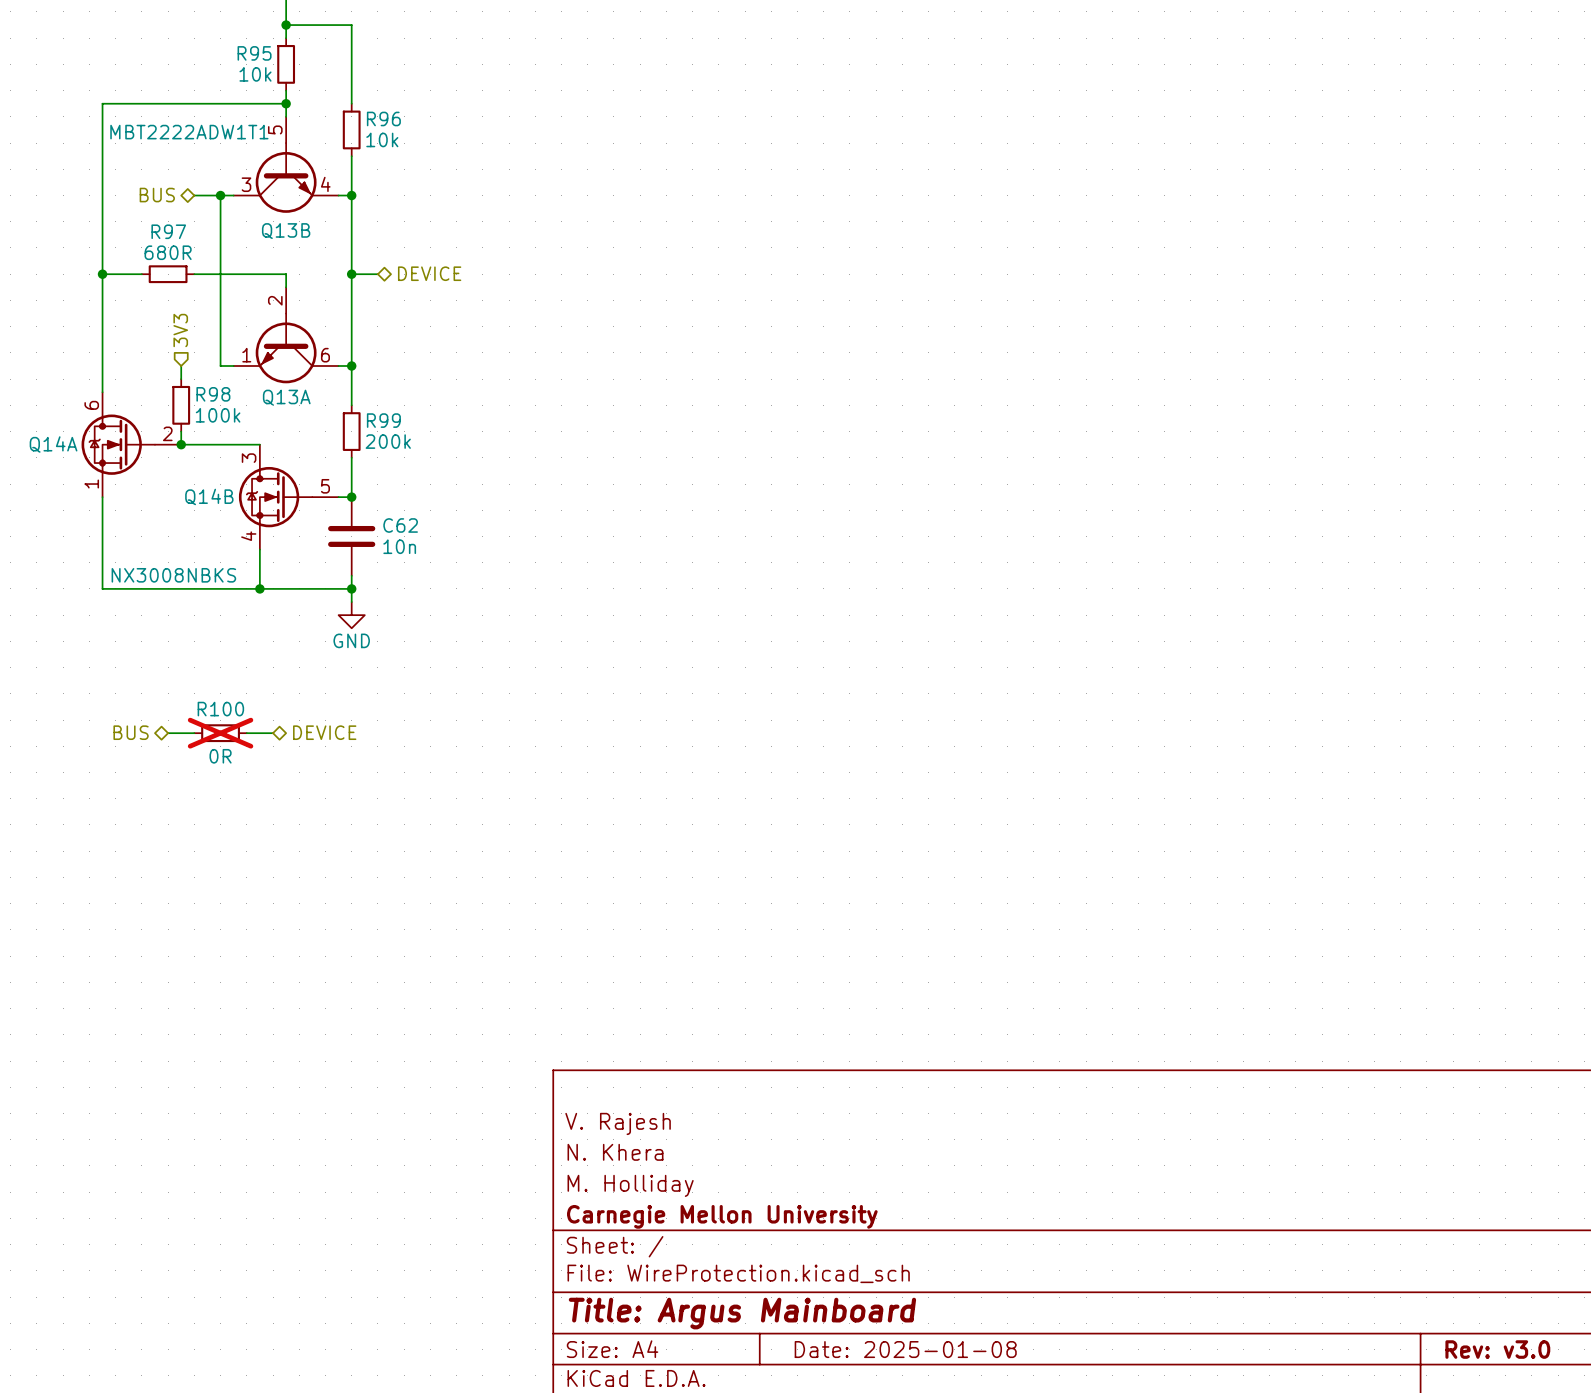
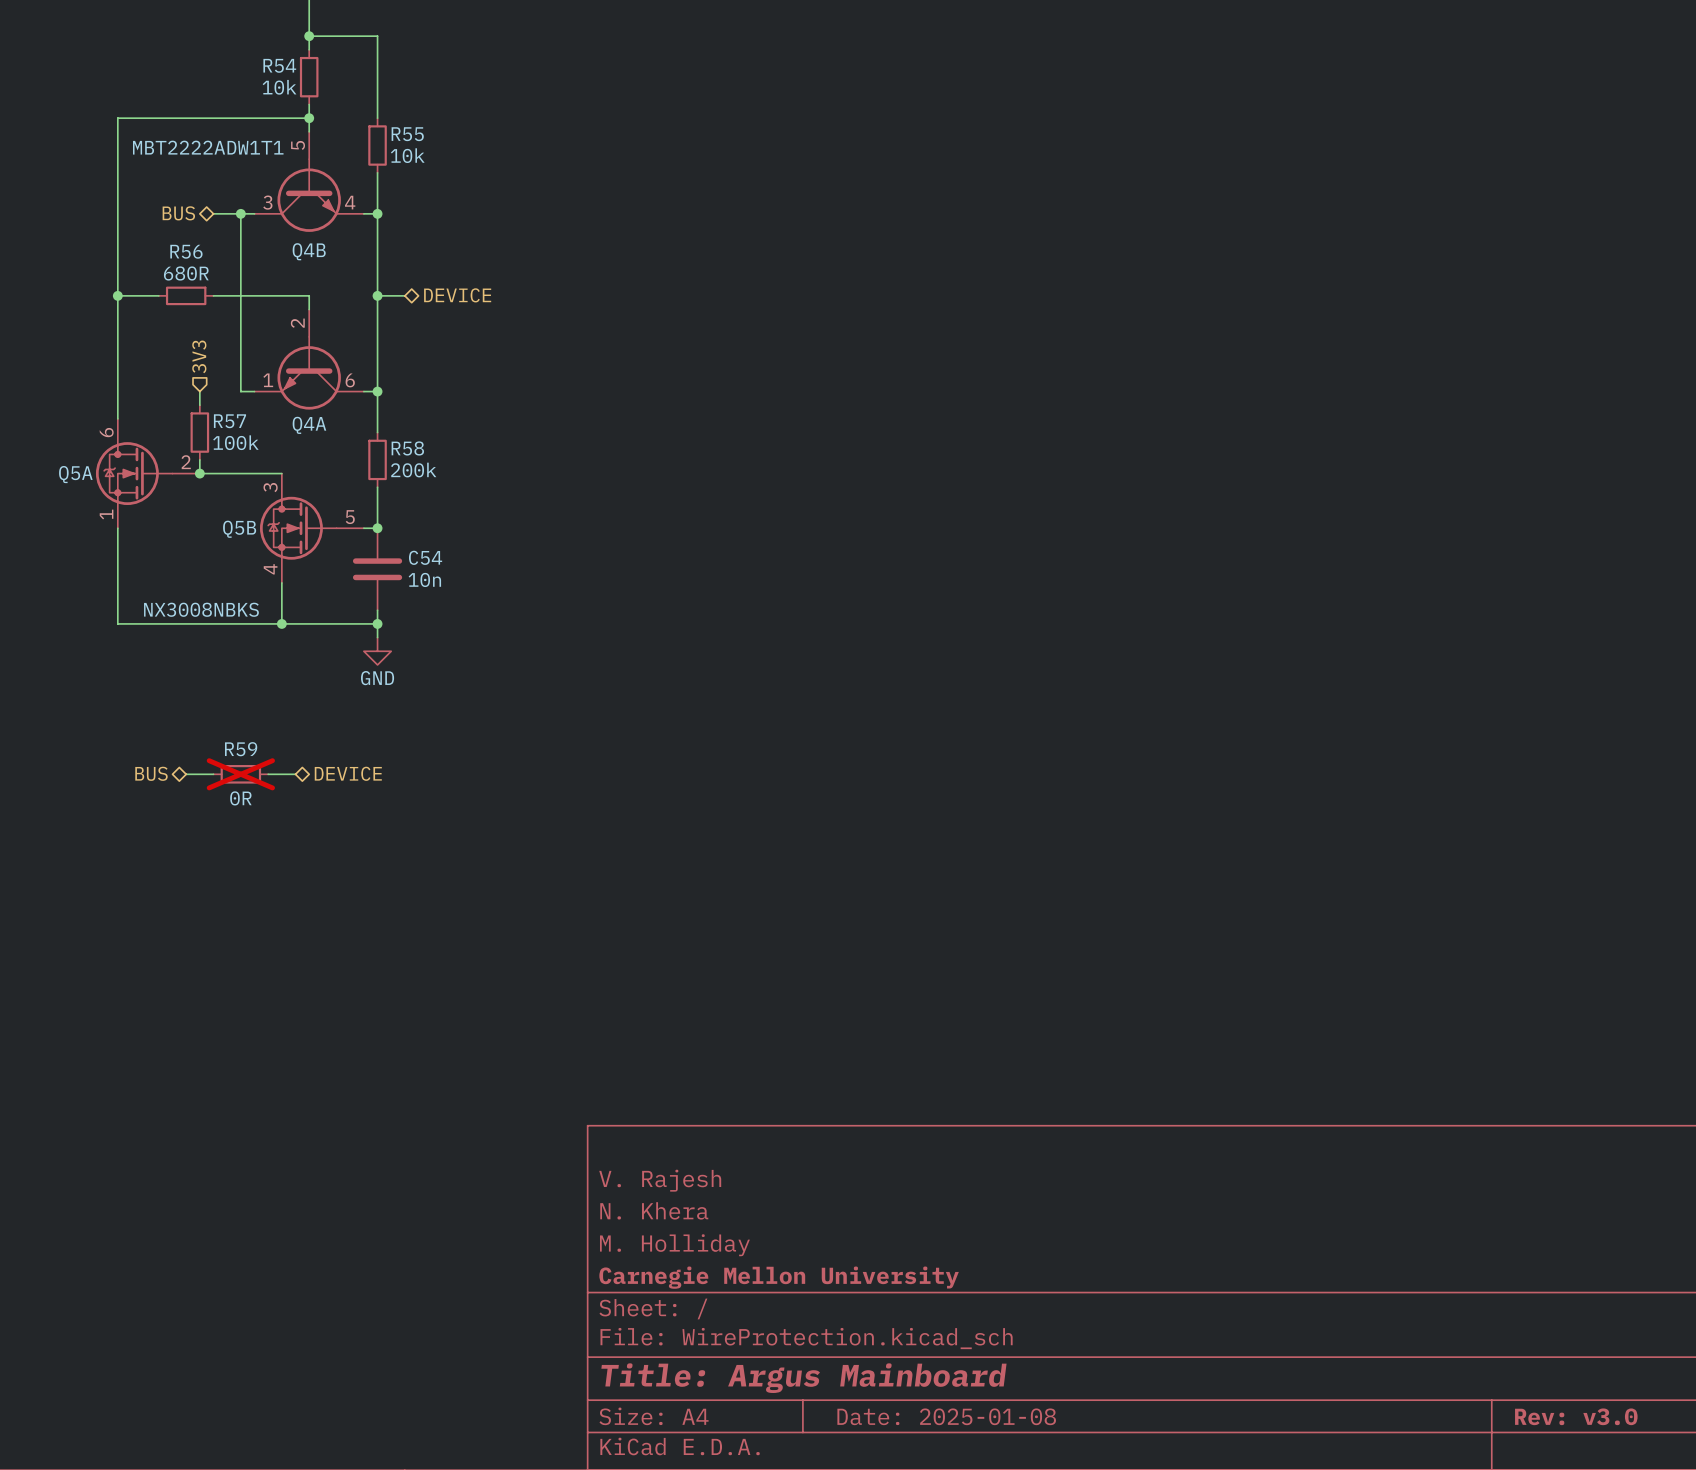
R95 name: R95 (254, 53) -> R54 (279, 65)
R96 name: R96 (383, 118) -> R55 (407, 134)
Q13B: MBT2222ADW1T1 (286, 164) -> none
Q4B: none -> MBT2222ADW1T1 (309, 181)
R97 name: R97 (168, 231) -> R56 (186, 251)
Q13A: (286, 335) -> none
Q4A: none -> (309, 359)
R98 name: R98 (213, 394) -> R57 (229, 421)
R99 name: R99 (383, 420) -> R58 (407, 448)
Q14A name: Q14A (53, 444) -> Q5A (75, 474)
Q14B name: Q14B (209, 496) -> Q5B (239, 529)
C62 name: C62 (400, 525) -> C54 (425, 557)
R100 name: R100 (220, 709) -> R59 (241, 749)

